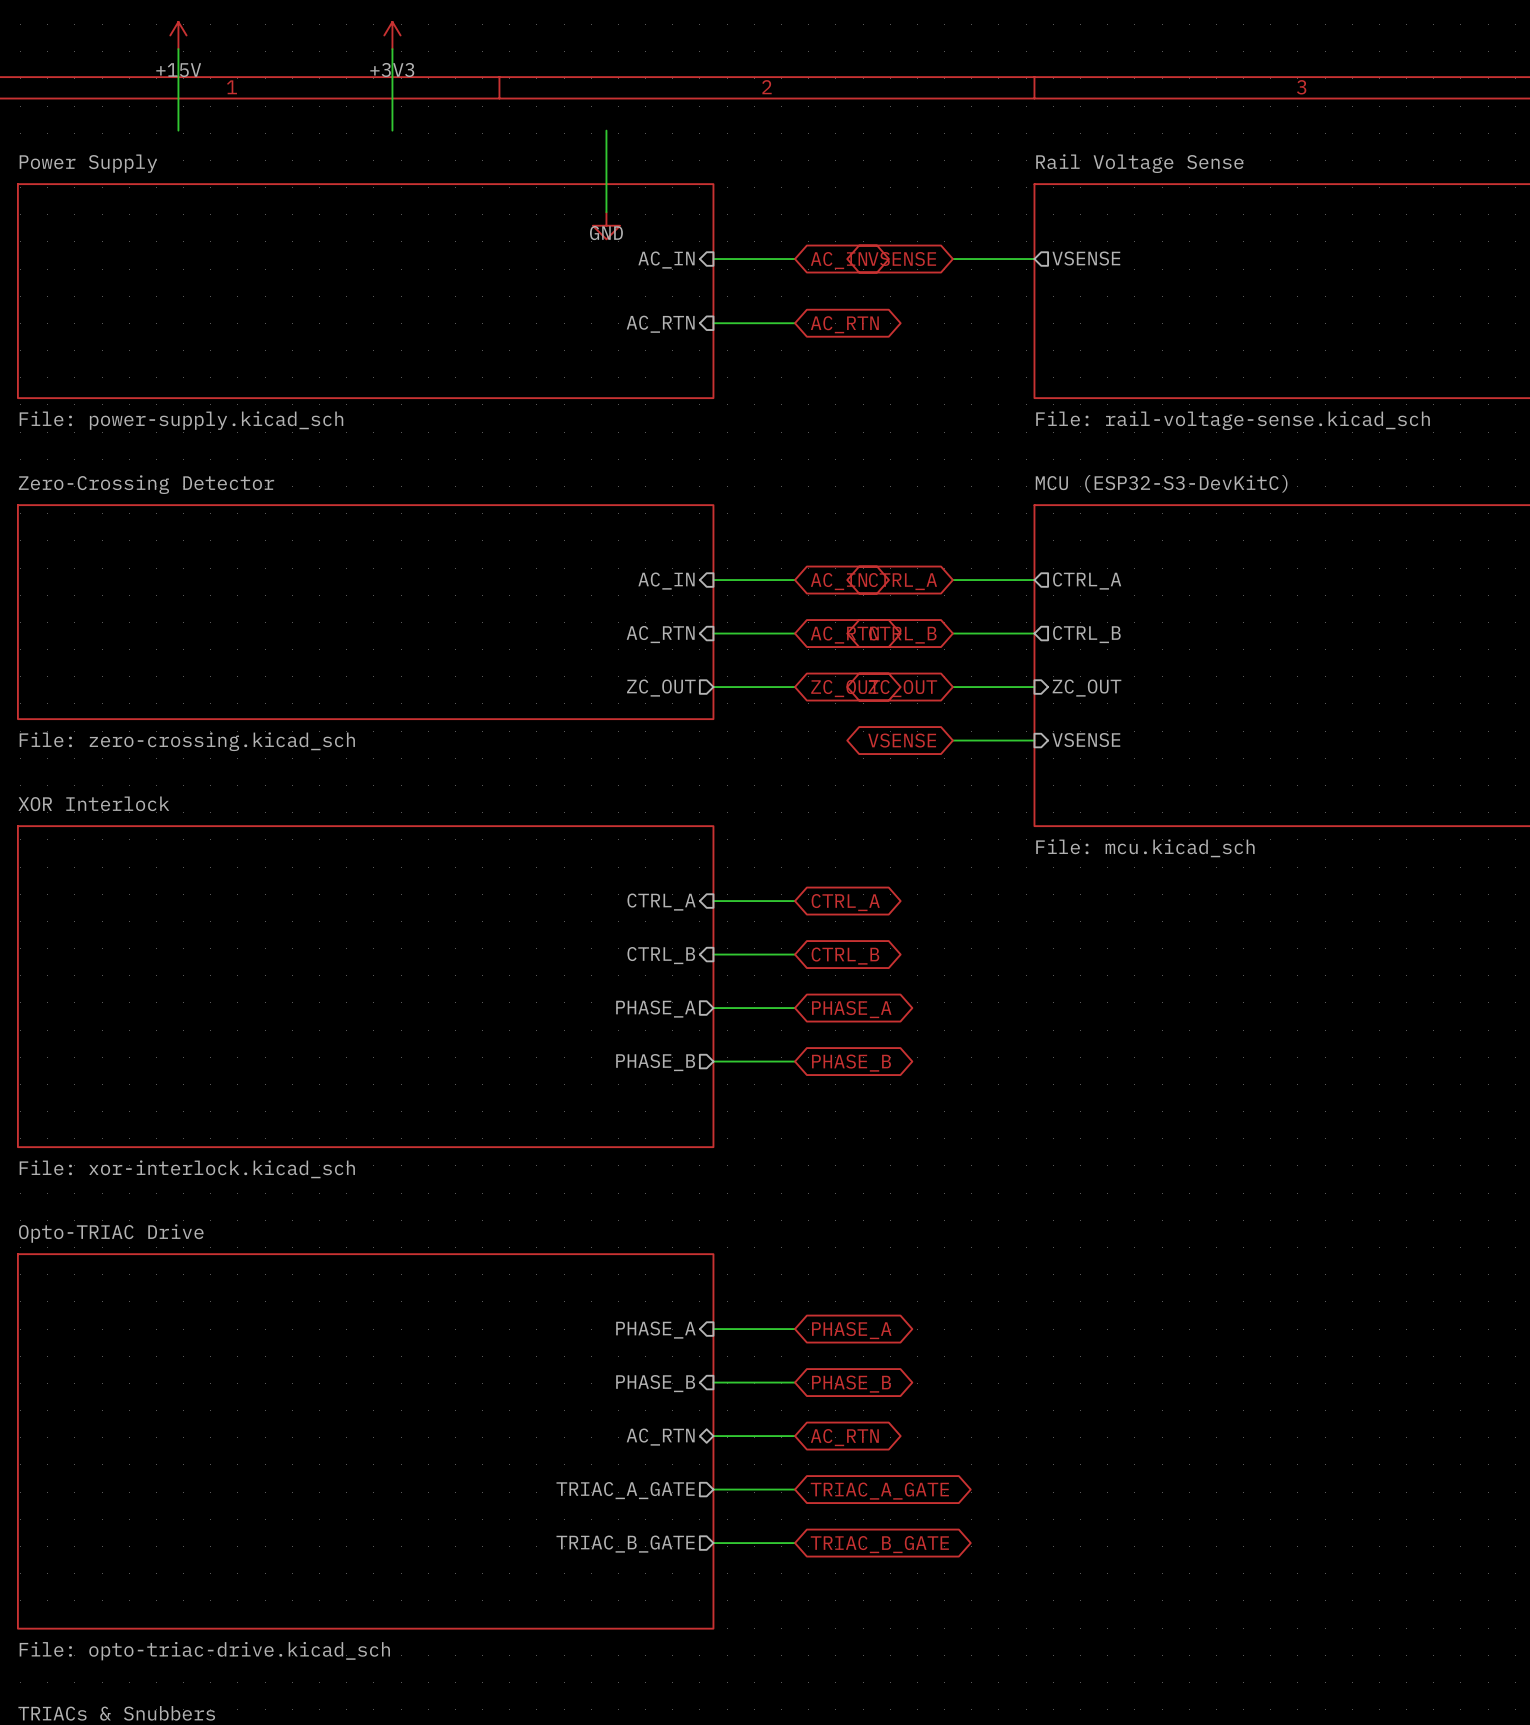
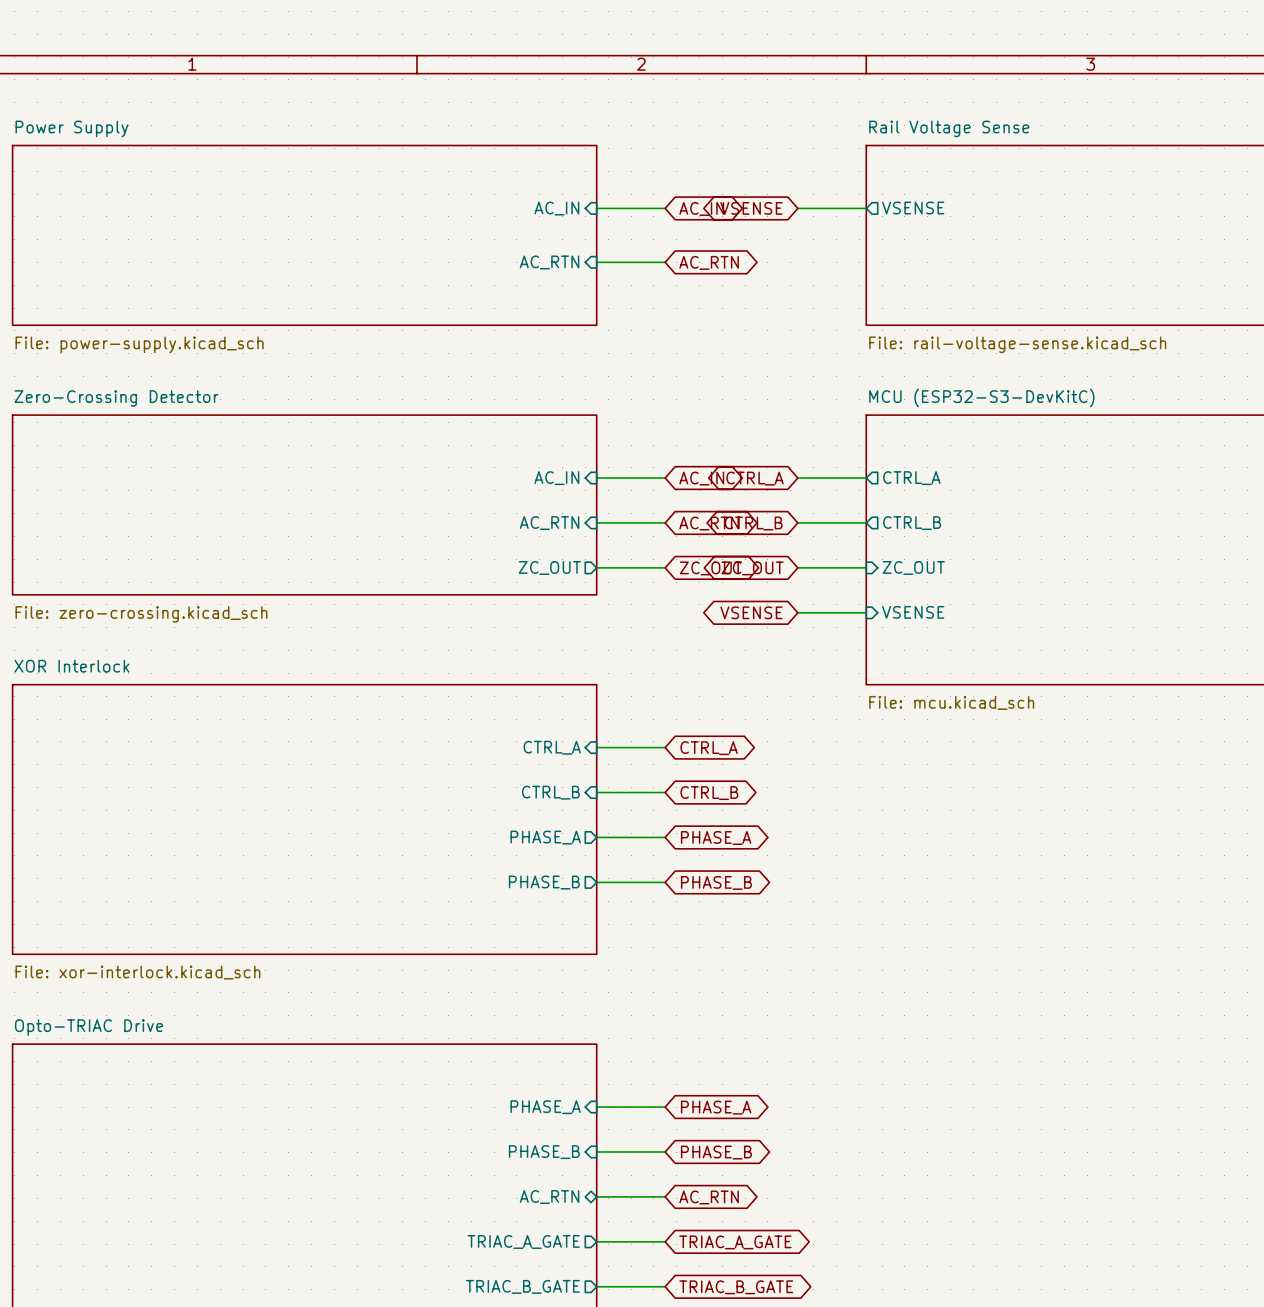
power symbol: +15V (178, 35) -> none
power symbol: +3V3 (392, 35) -> none
wire: (178, 49) (178, 130) -> none
wire: (392, 49) (392, 130) -> none
wire: (606, 130) (606, 212) -> none
power symbol: GND (606, 225) -> none

